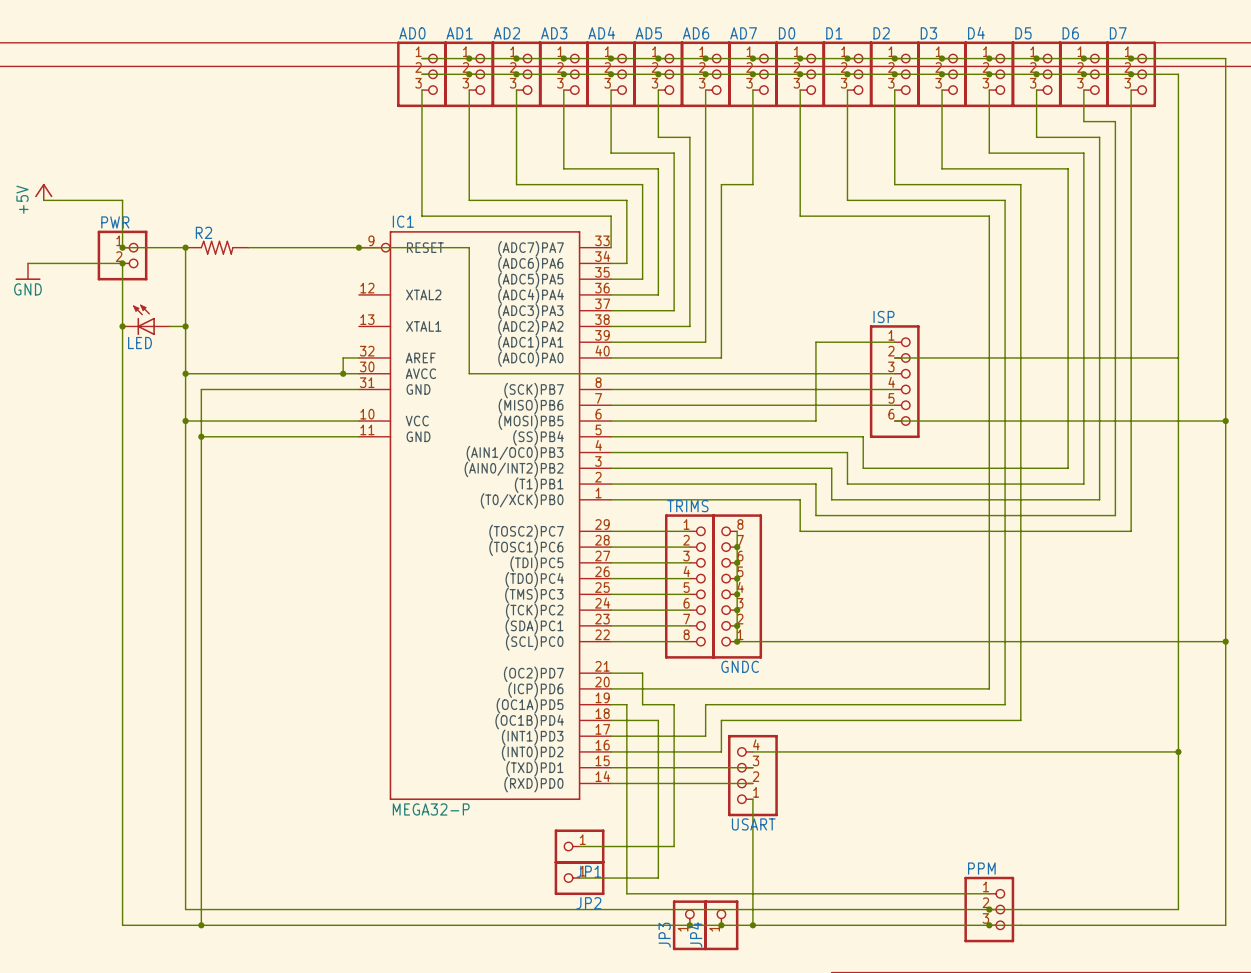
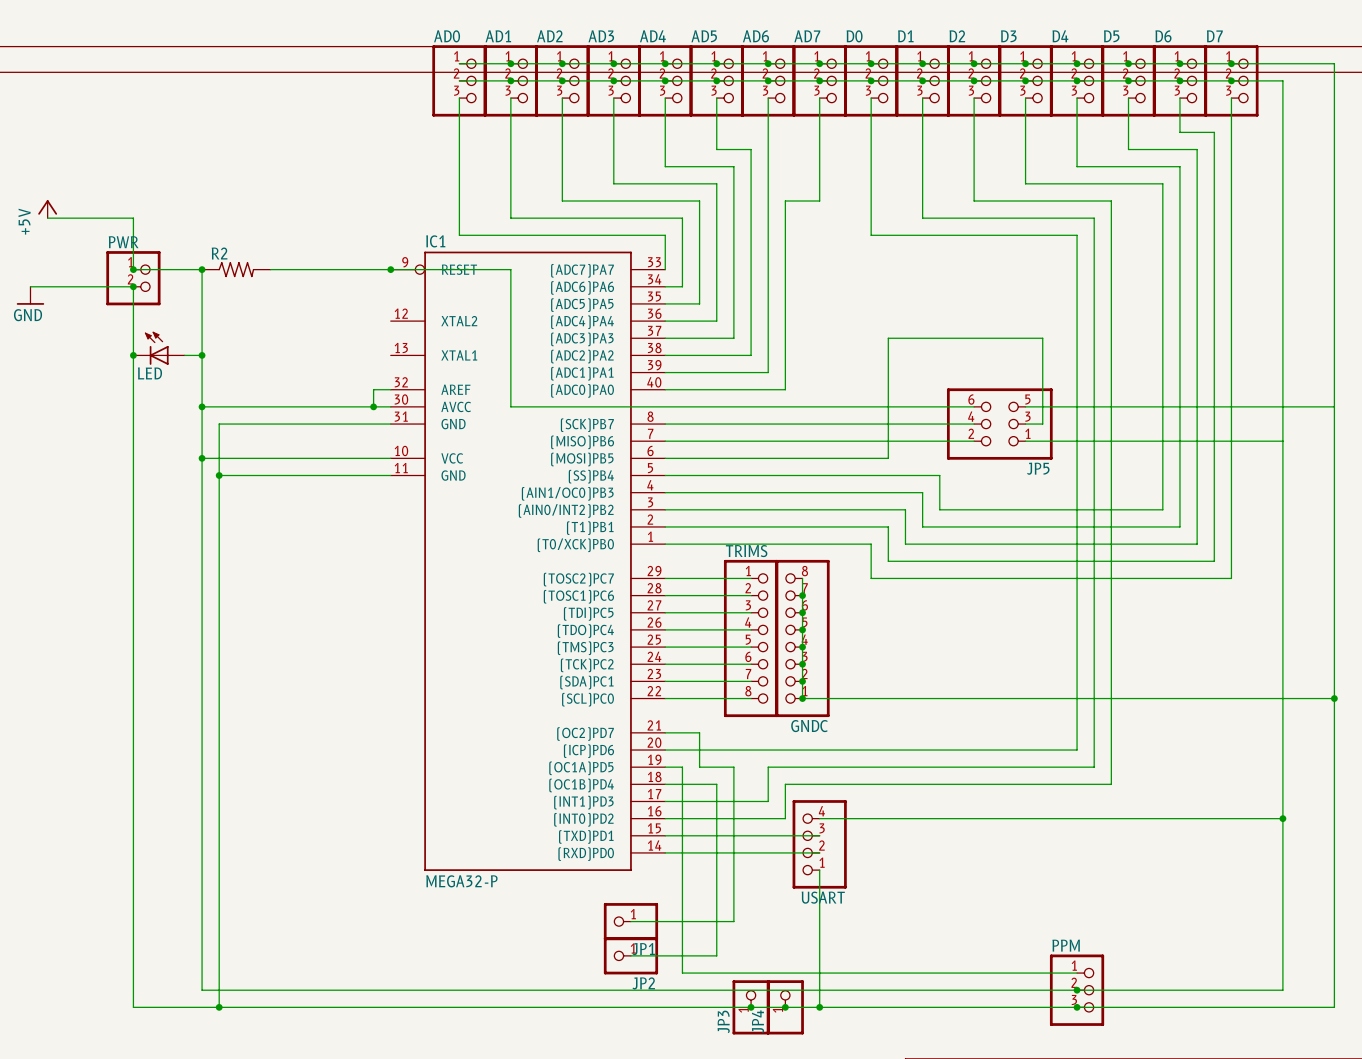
wire: (815, 342) (894, 342) -> (888, 372) (888, 338) (1042, 338) (1042, 424) (1025, 424)
wire: (894, 357) (1178, 357) -> (1025, 406) (1334, 406)
ISP: (894, 381) -> none
JP5: none -> (999, 424)
wire: none -> (1025, 441) (1282, 441)
wire: (894, 421) (1225, 421) -> none
junction: (1225, 421) -> none

